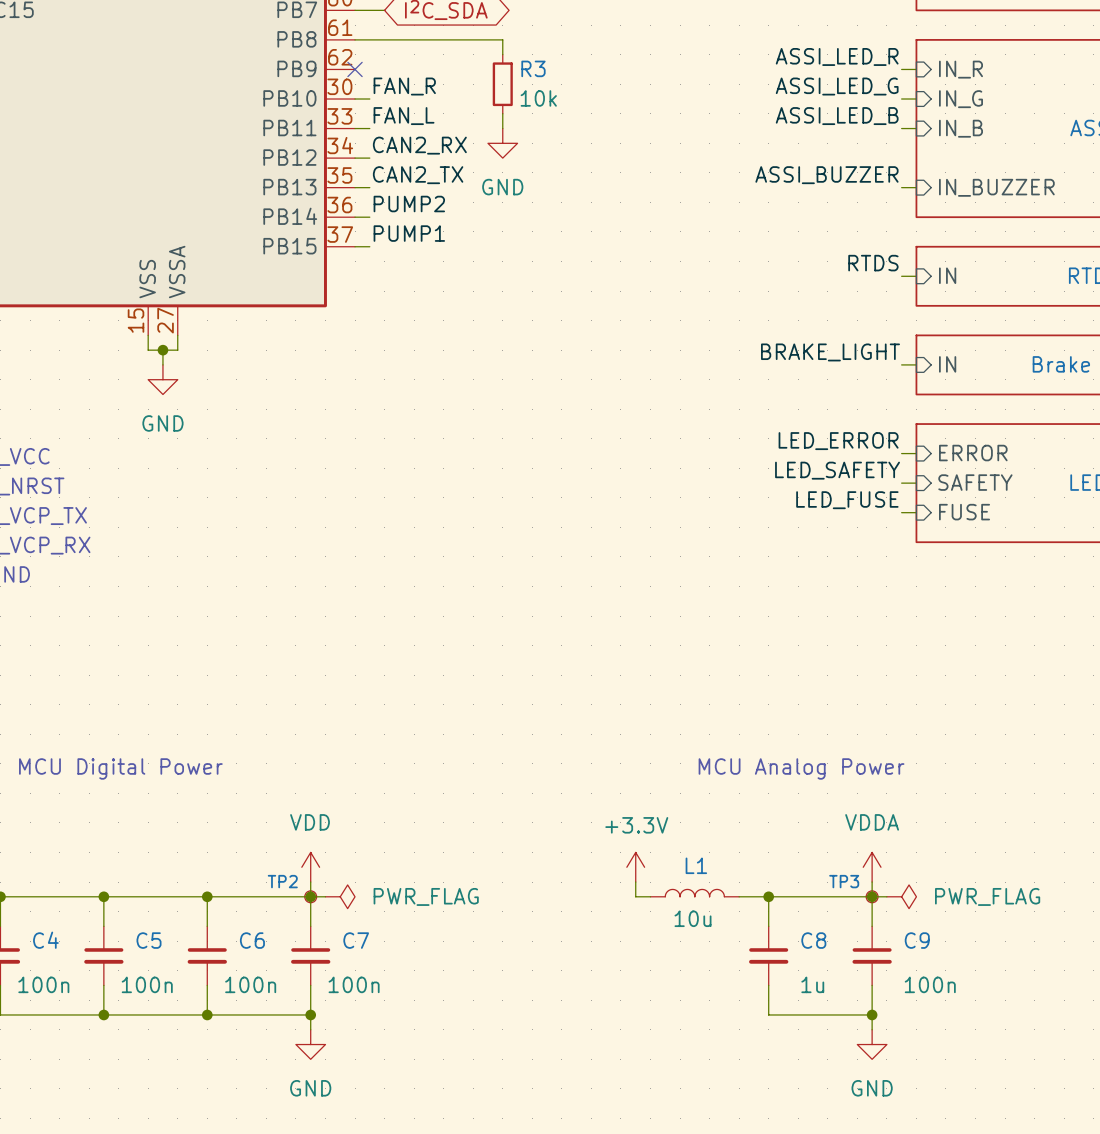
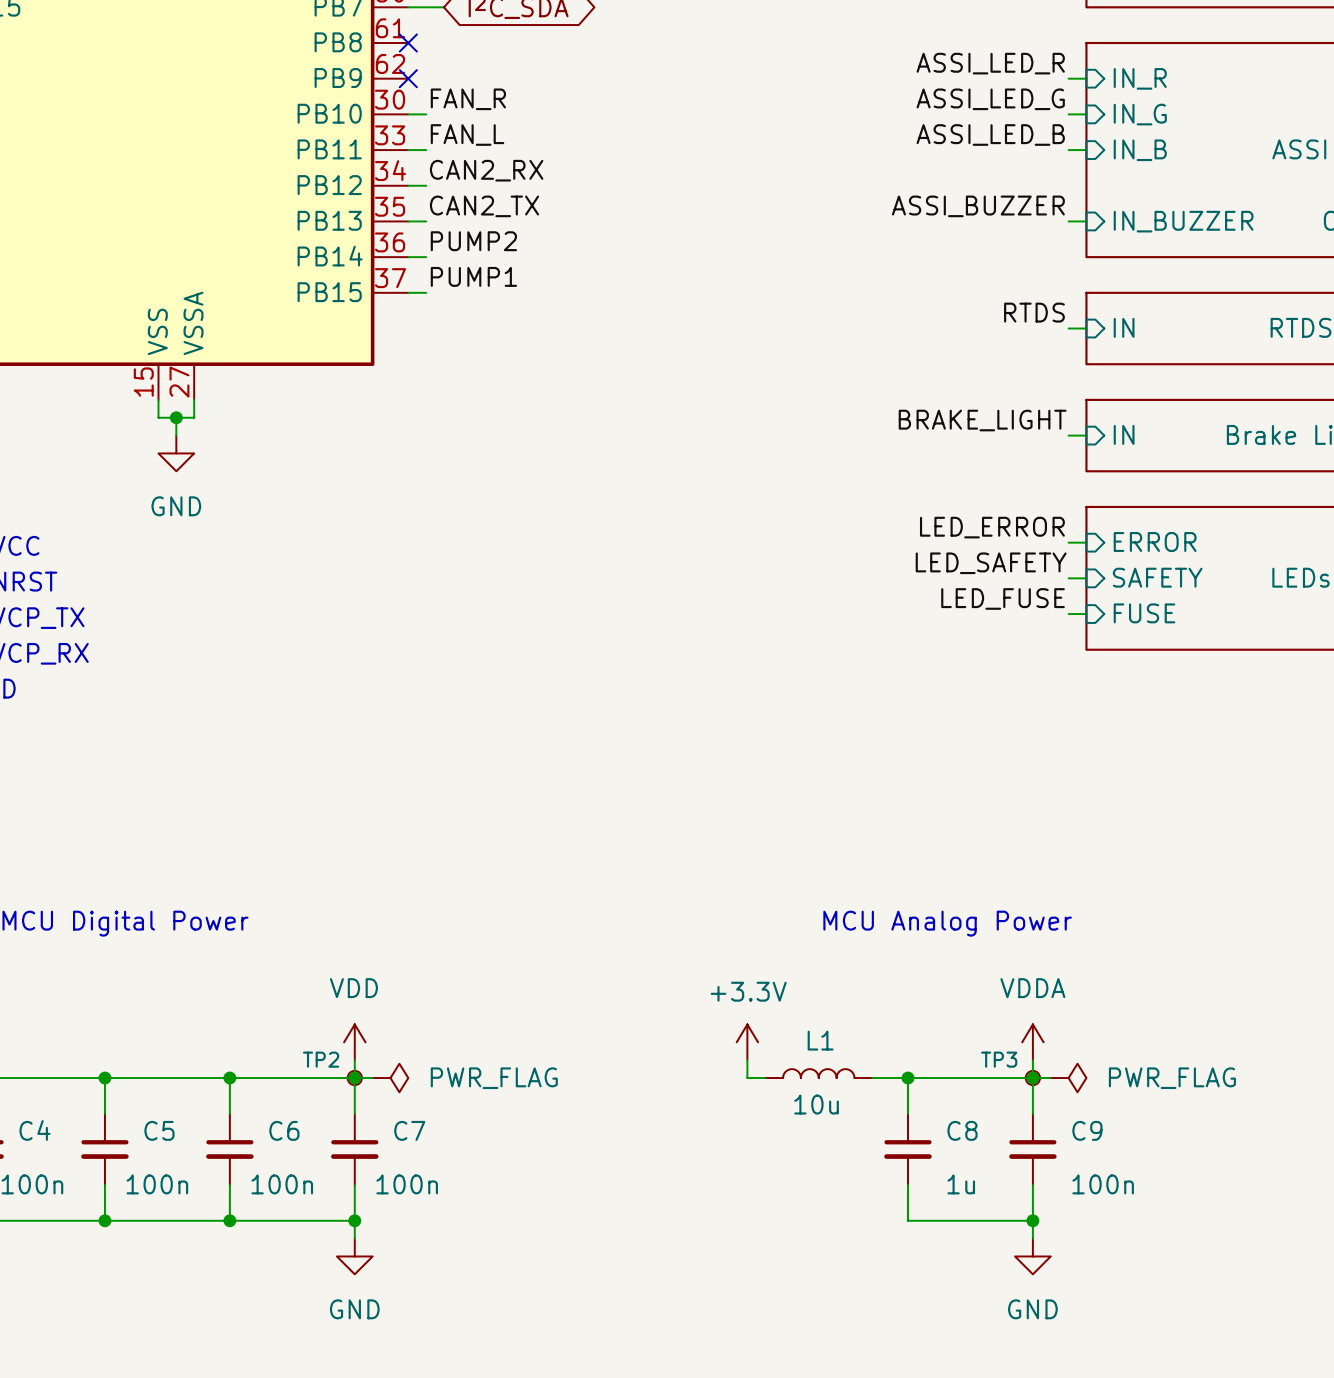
wire: (355, 39) (502, 39) (502, 54) -> none
no-connect mark: none -> (408, 43)
R3: 10k (502, 84) -> none
wire: (502, 113) (502, 128) -> none
power symbol: GND (502, 143) -> none

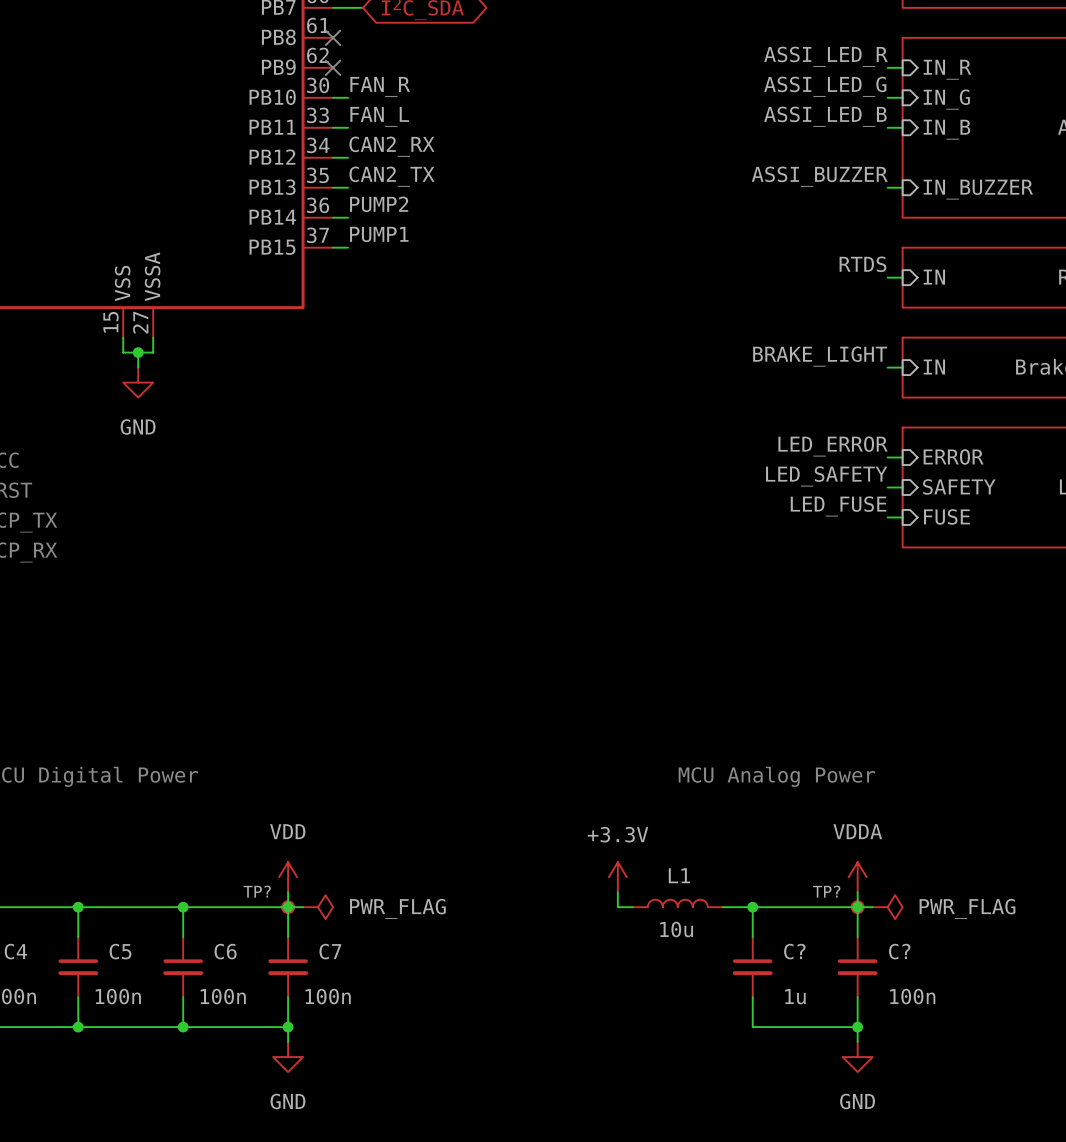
TP2 name: TP2 (321, 1059) -> TP? (257, 891)
TP3 name: TP3 (999, 1059) -> TP? (826, 891)
C8 name: C8 (962, 1130) -> C? (794, 951)
C9 name: C9 (1087, 1130) -> C? (899, 951)

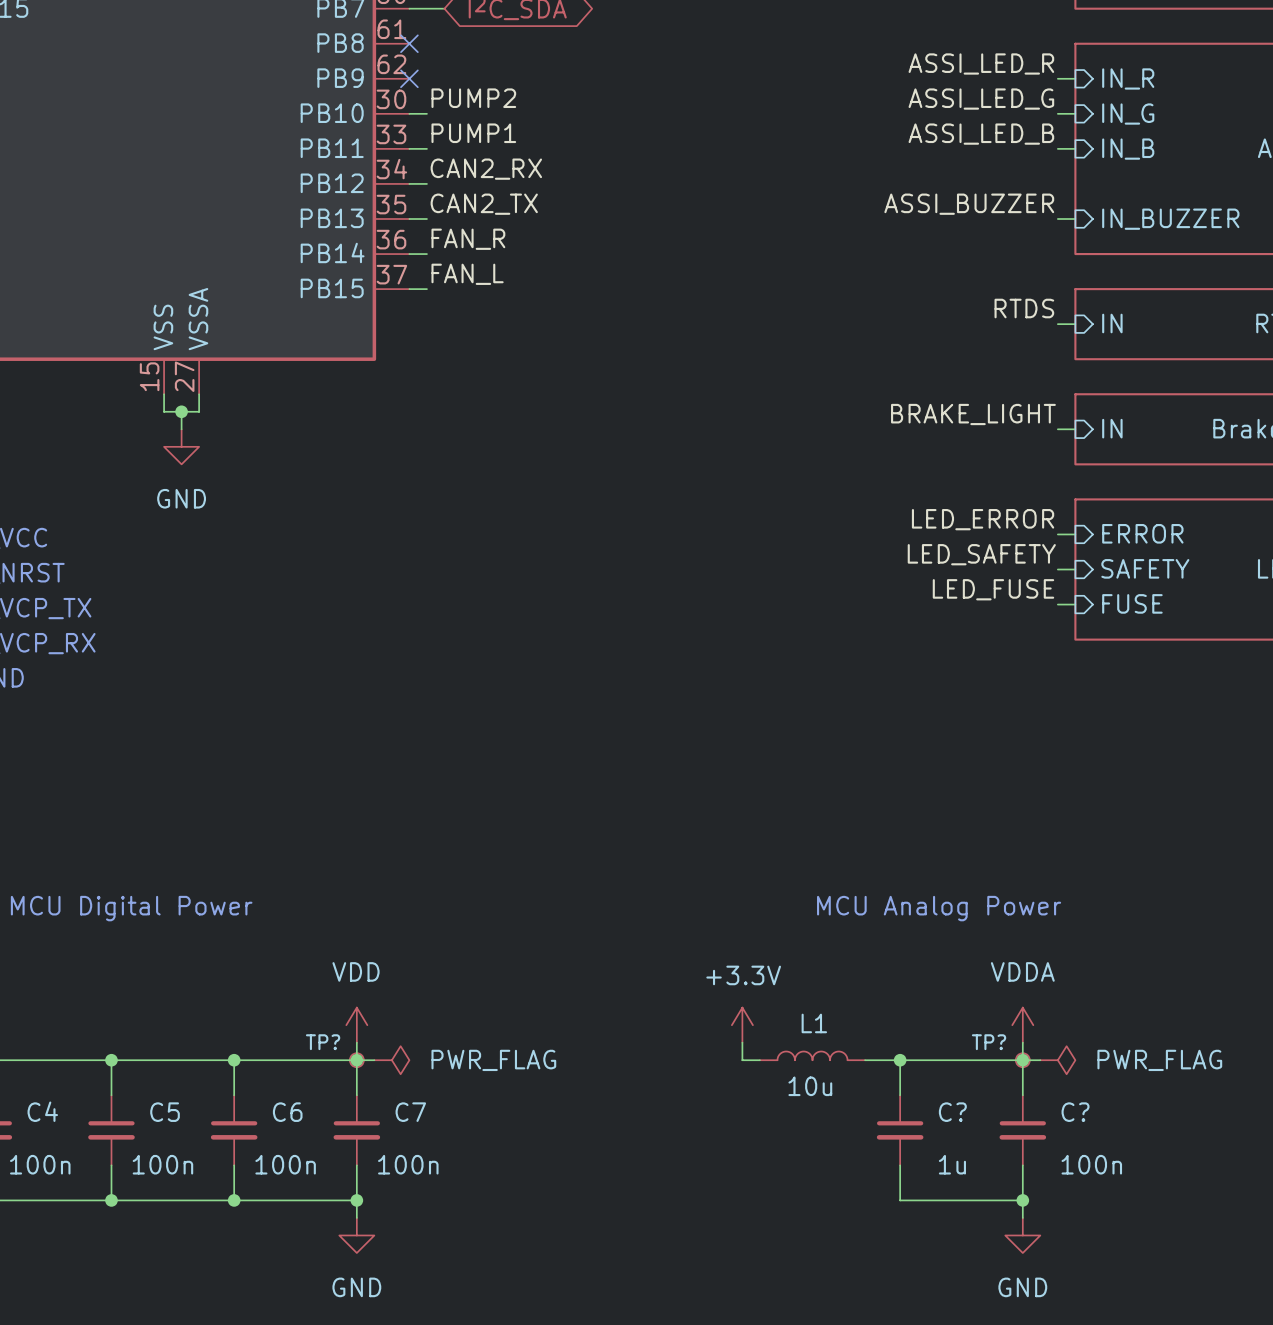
label: FAN_R (380, 86) -> PUMP2 (473, 98)
label: FAN_L (379, 116) -> PUMP1 (473, 133)
label: PUMP2 (379, 204) -> FAN_R (468, 239)
label: PUMP1 (379, 234) -> FAN_L (467, 274)

